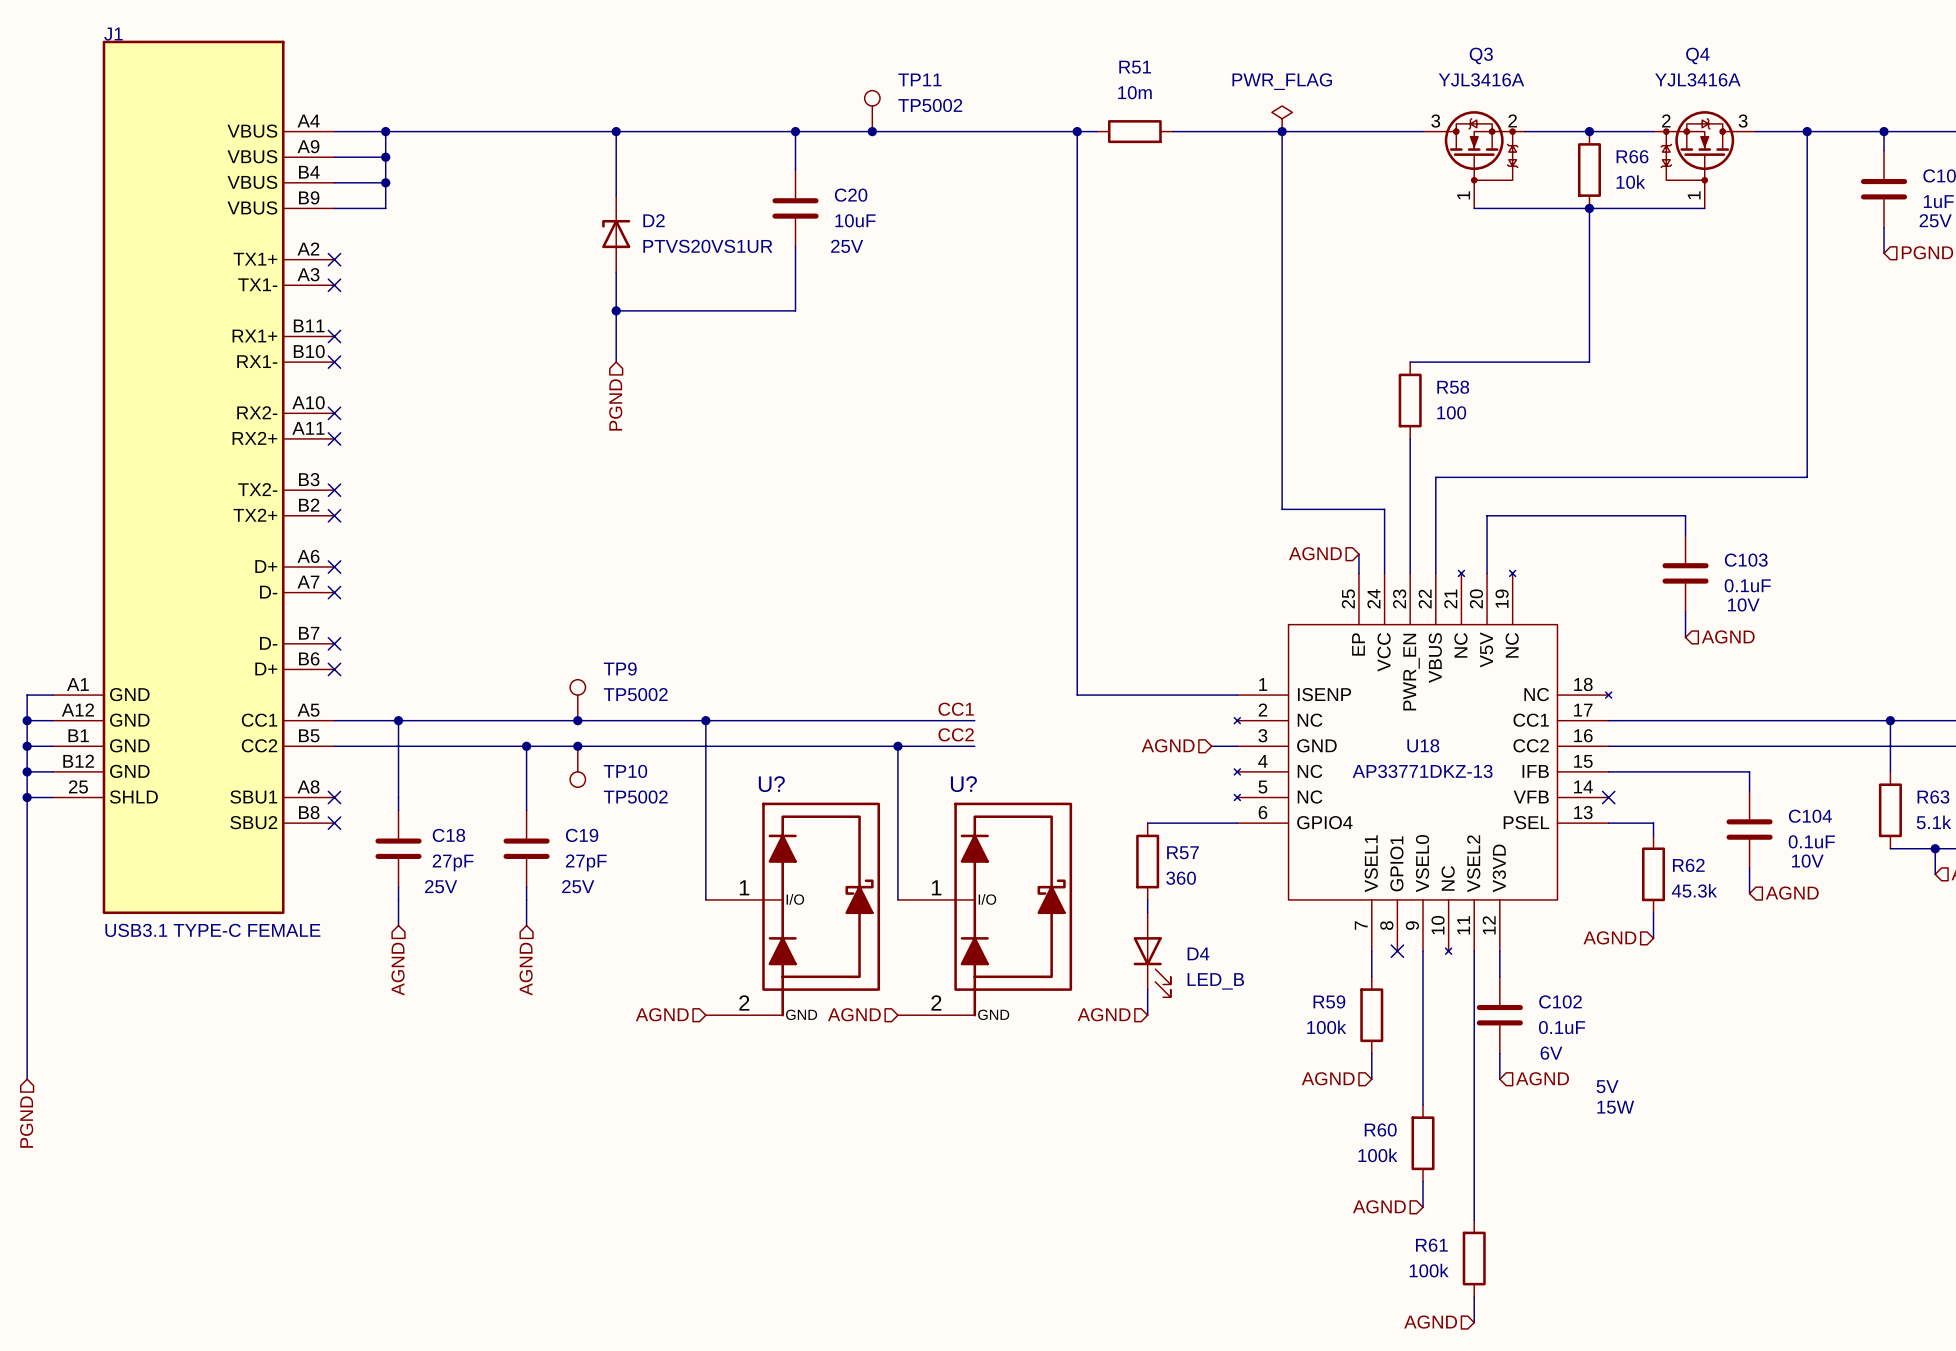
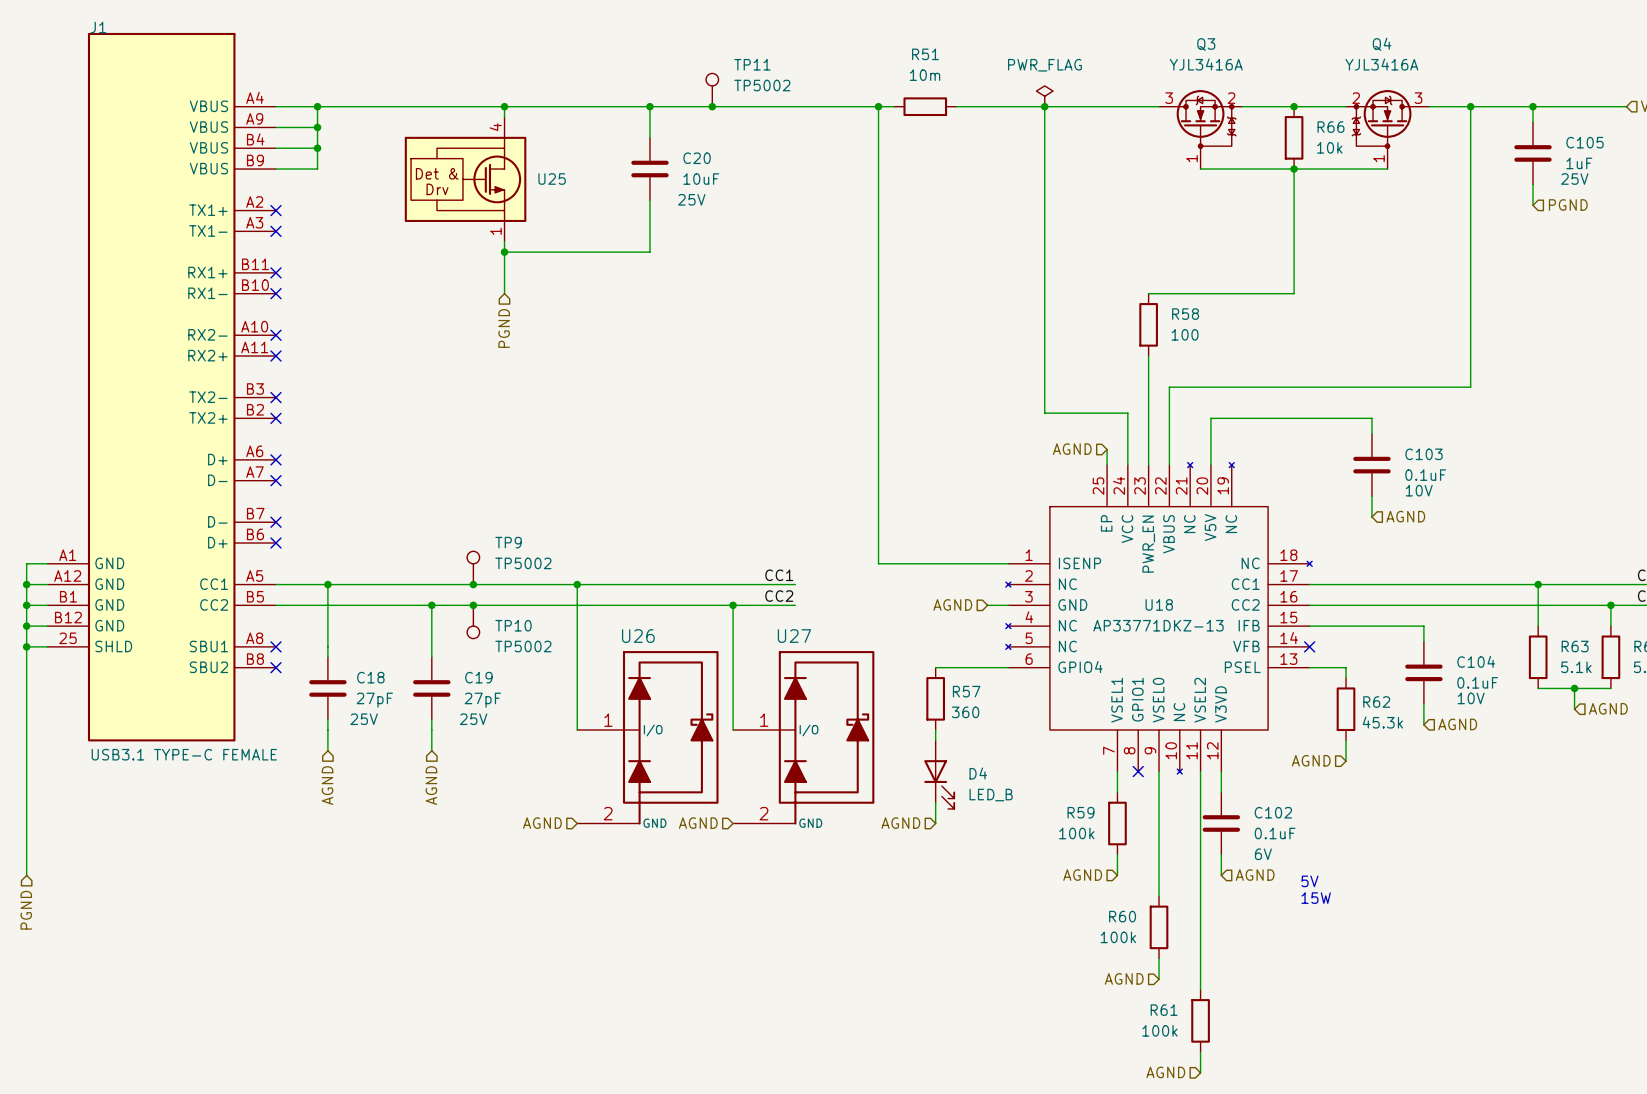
U25: none -> (465, 179)
D2: PTVS20VS1UR (616, 234) -> none
U? name: U? (771, 784) -> U26 (638, 636)
U? name: U? (963, 784) -> U27 (794, 636)

